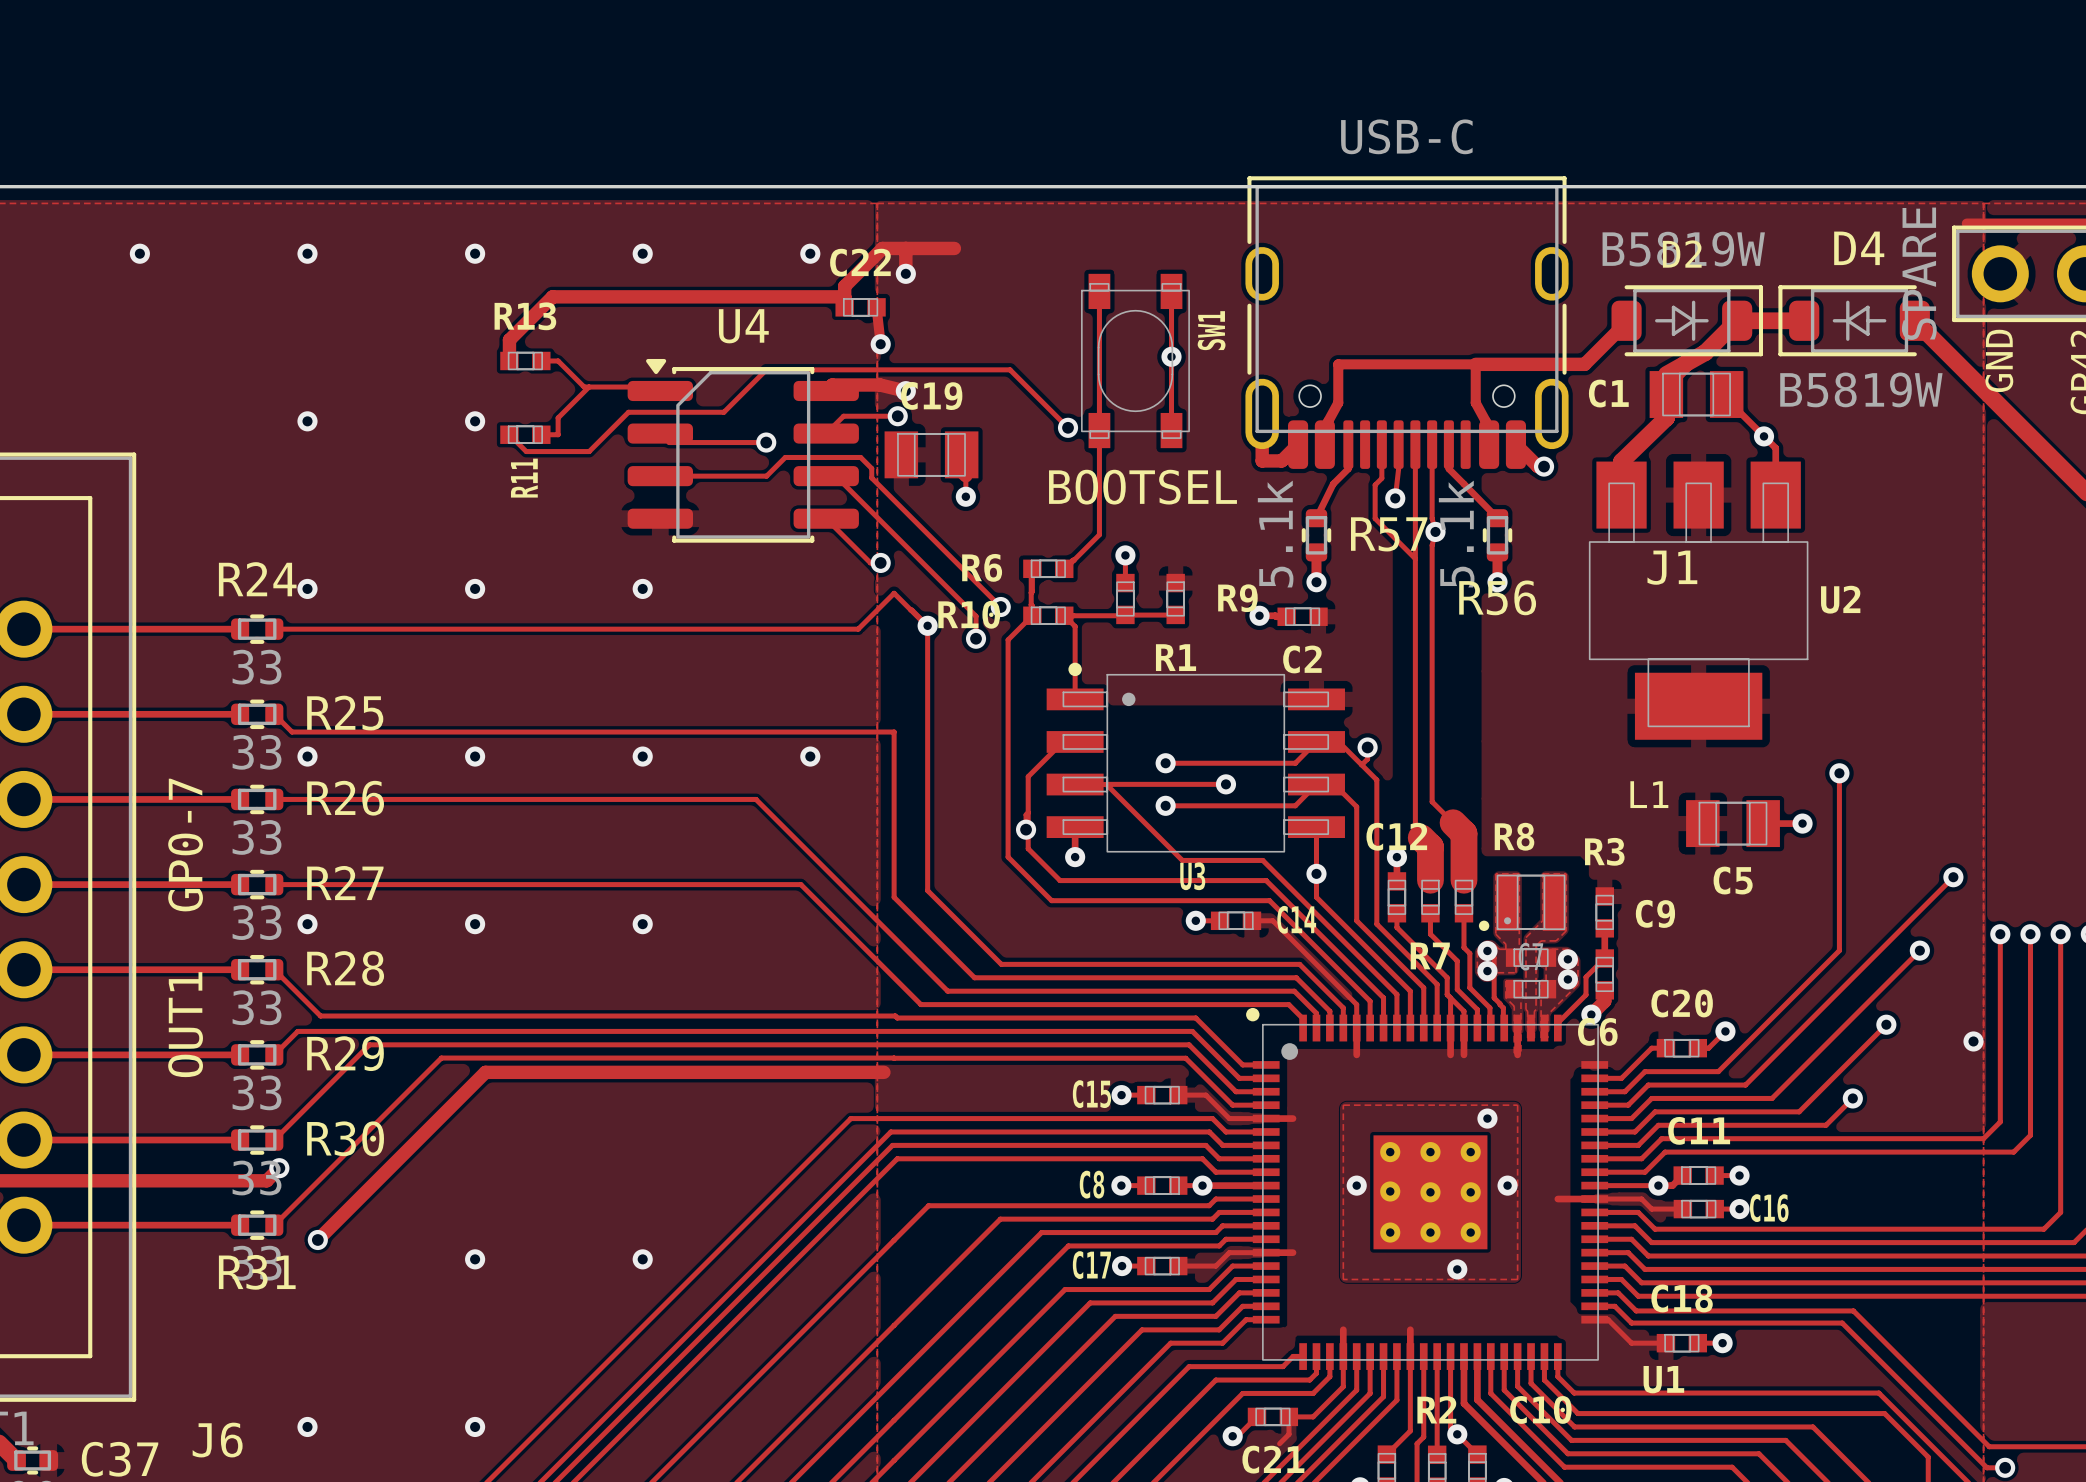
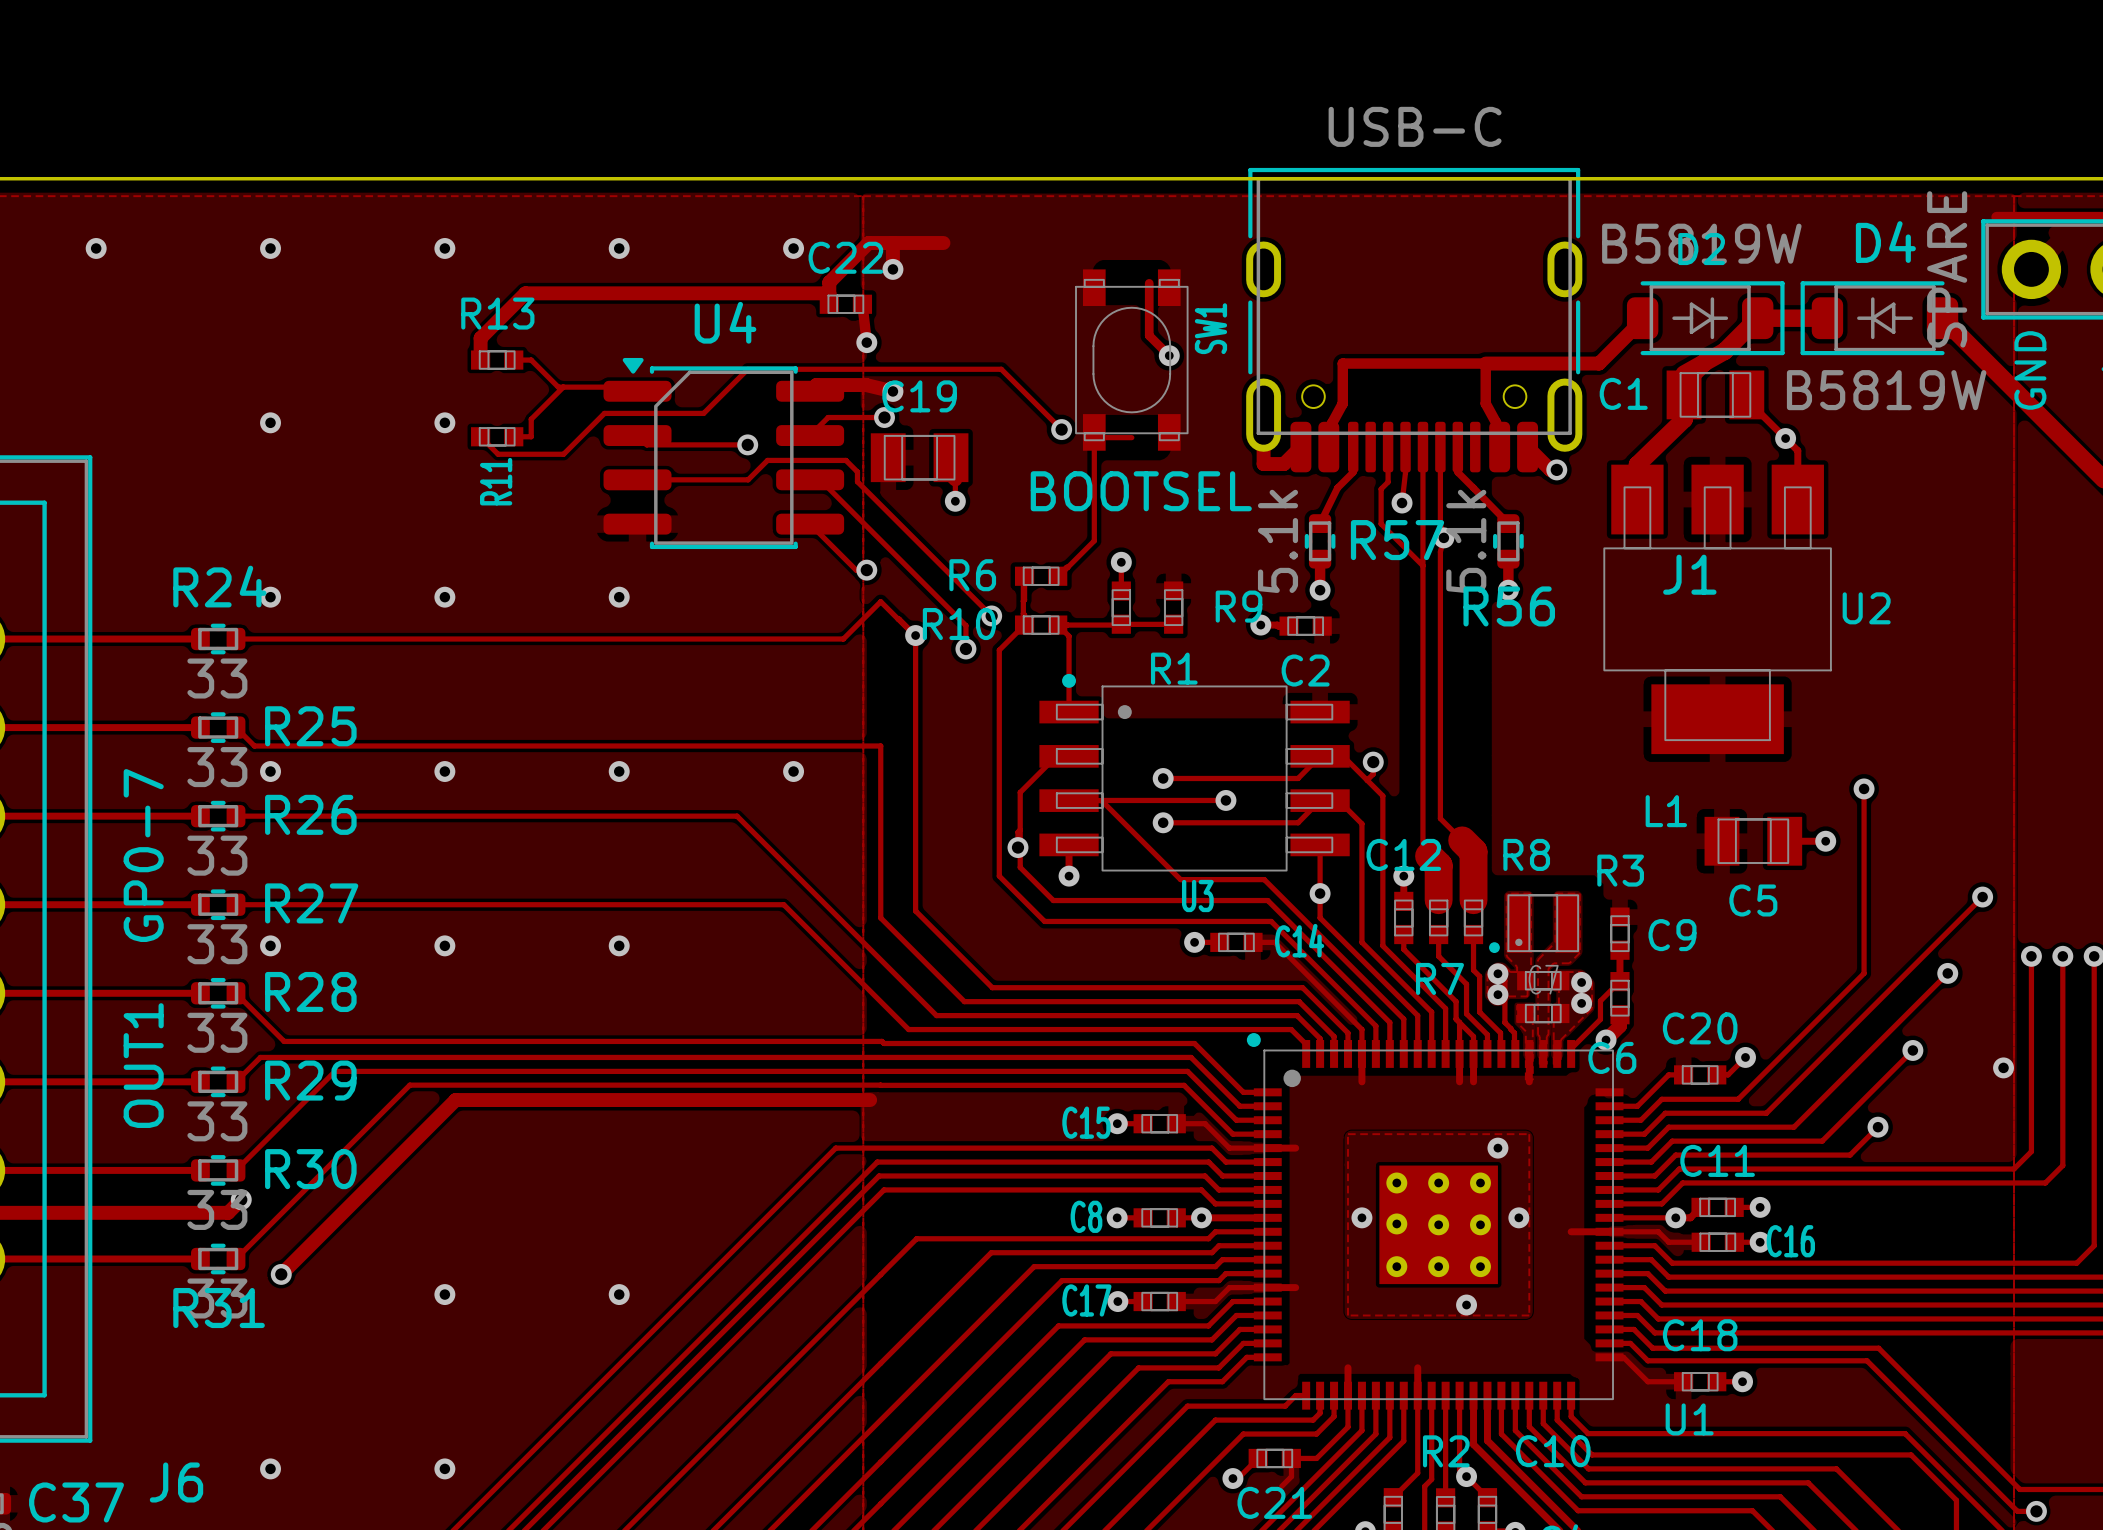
track: none -> (1149, 283) (1149, 335) (1169, 355)
track: (1099, 291) (1099, 430) -> (1131, 437) (1099, 437) (1094, 432)
track: (1171, 291) (1171, 430) -> none

